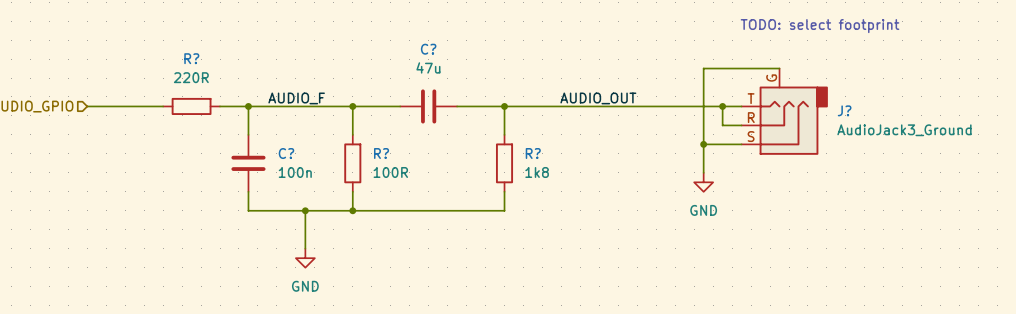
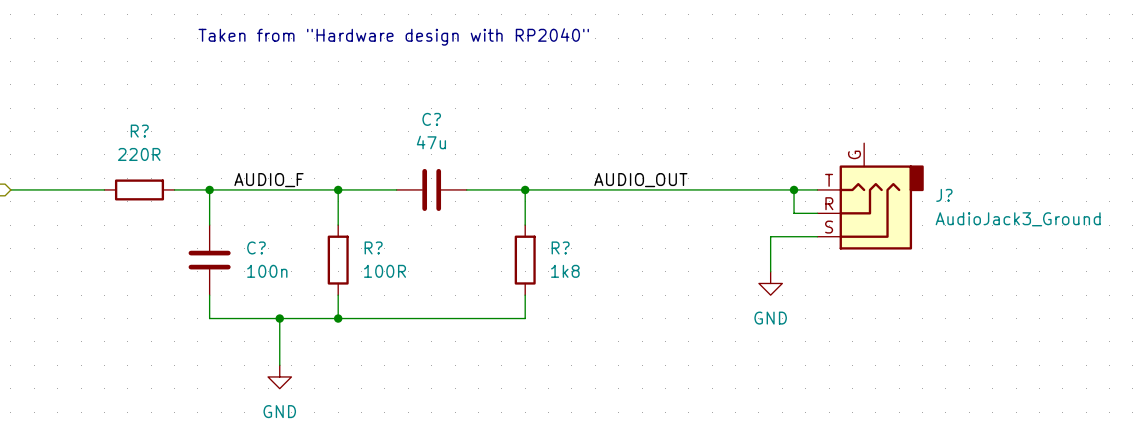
text: TODO: select footprint (820, 26) -> none
wire: (779, 68) (703, 68) (703, 144) -> none
junction: (703, 144) -> none

